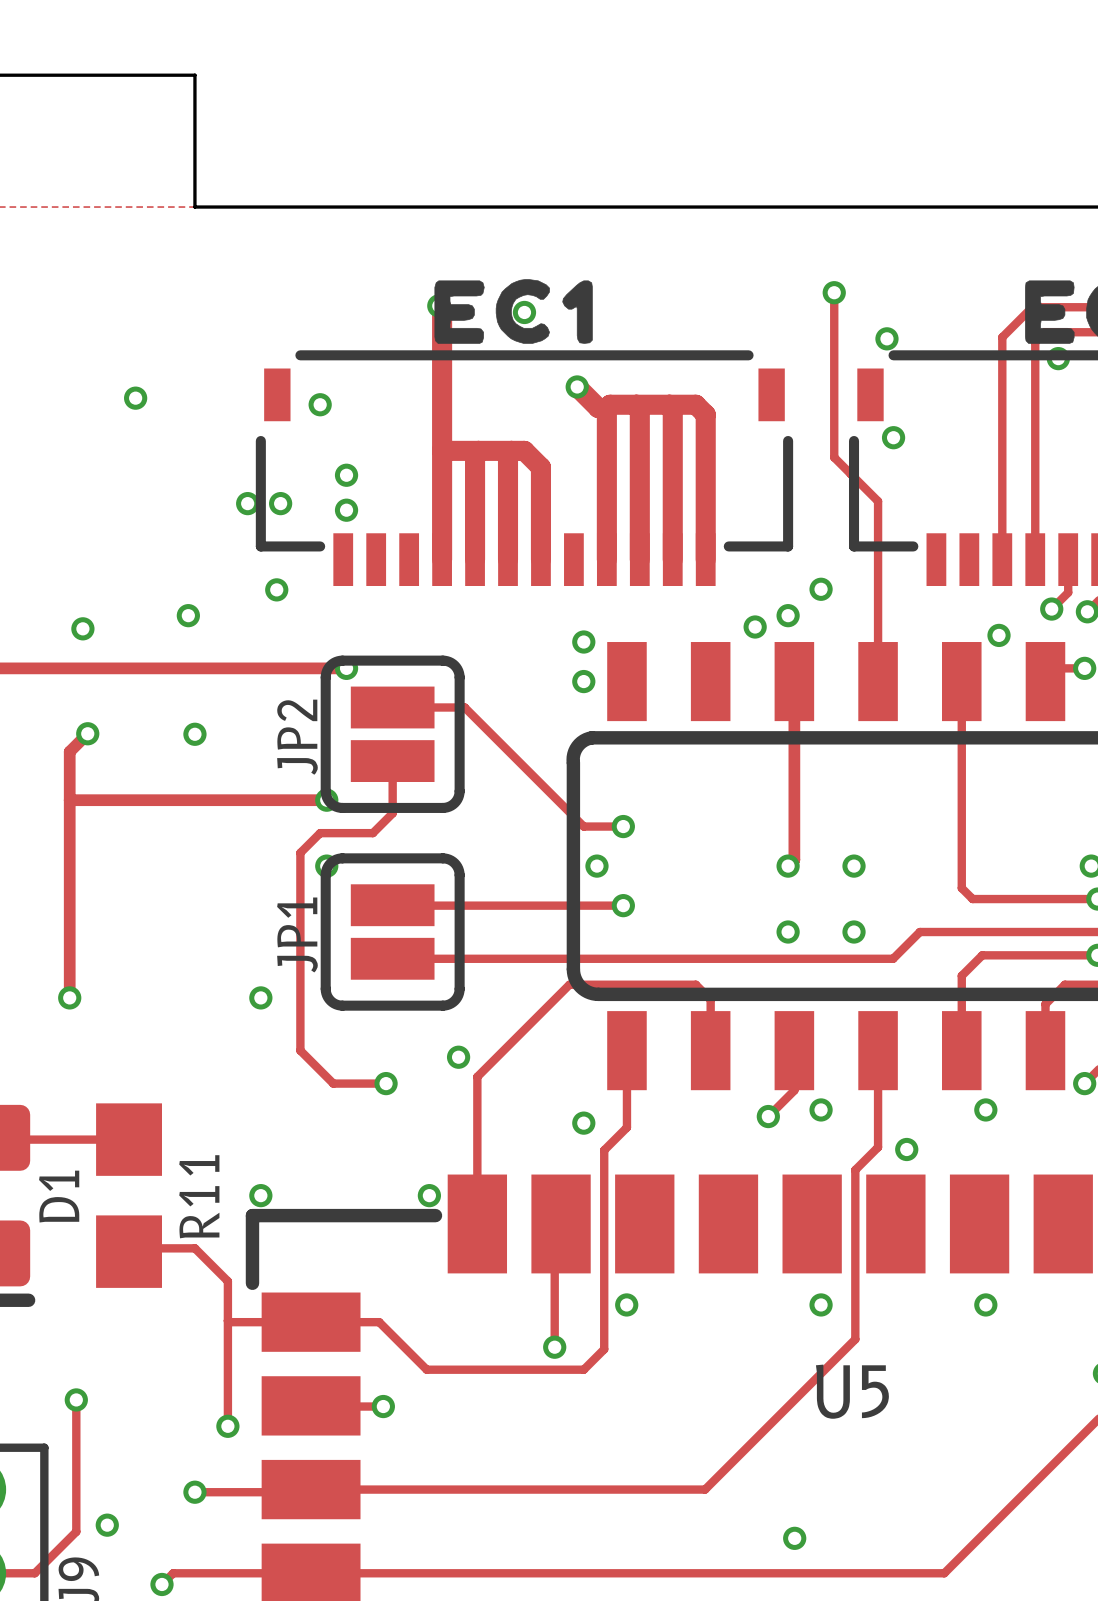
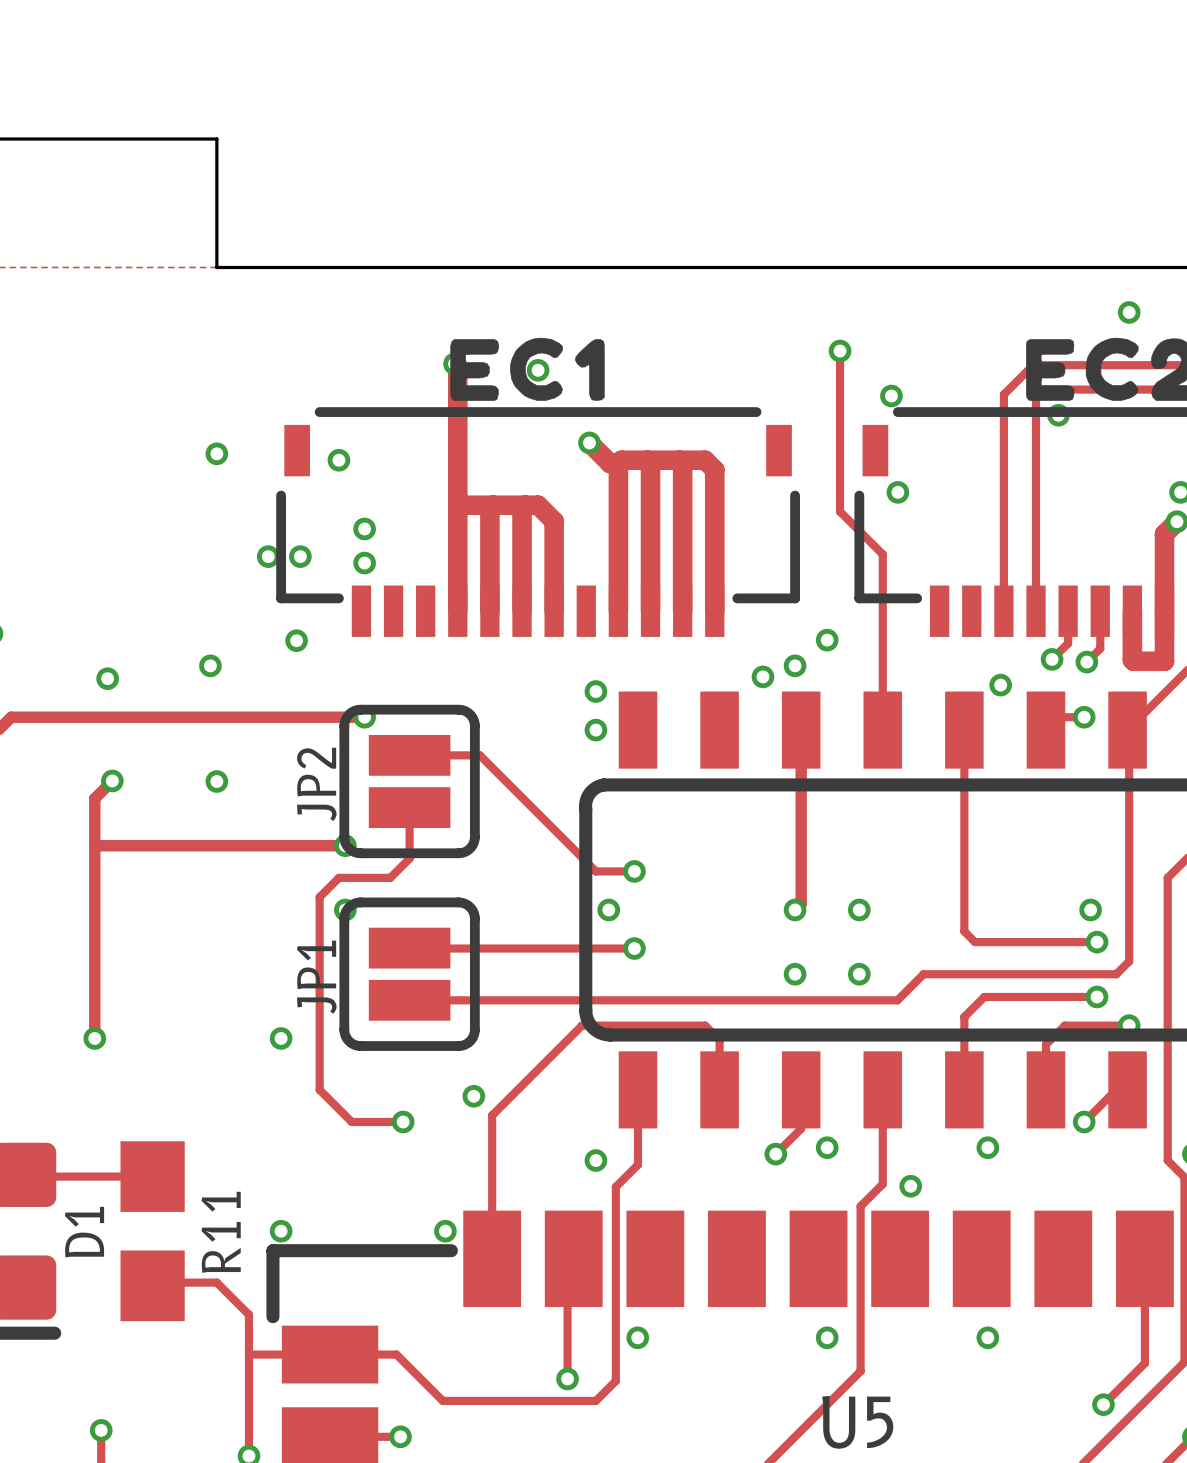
via position: (135, 398) -> (216, 453)

